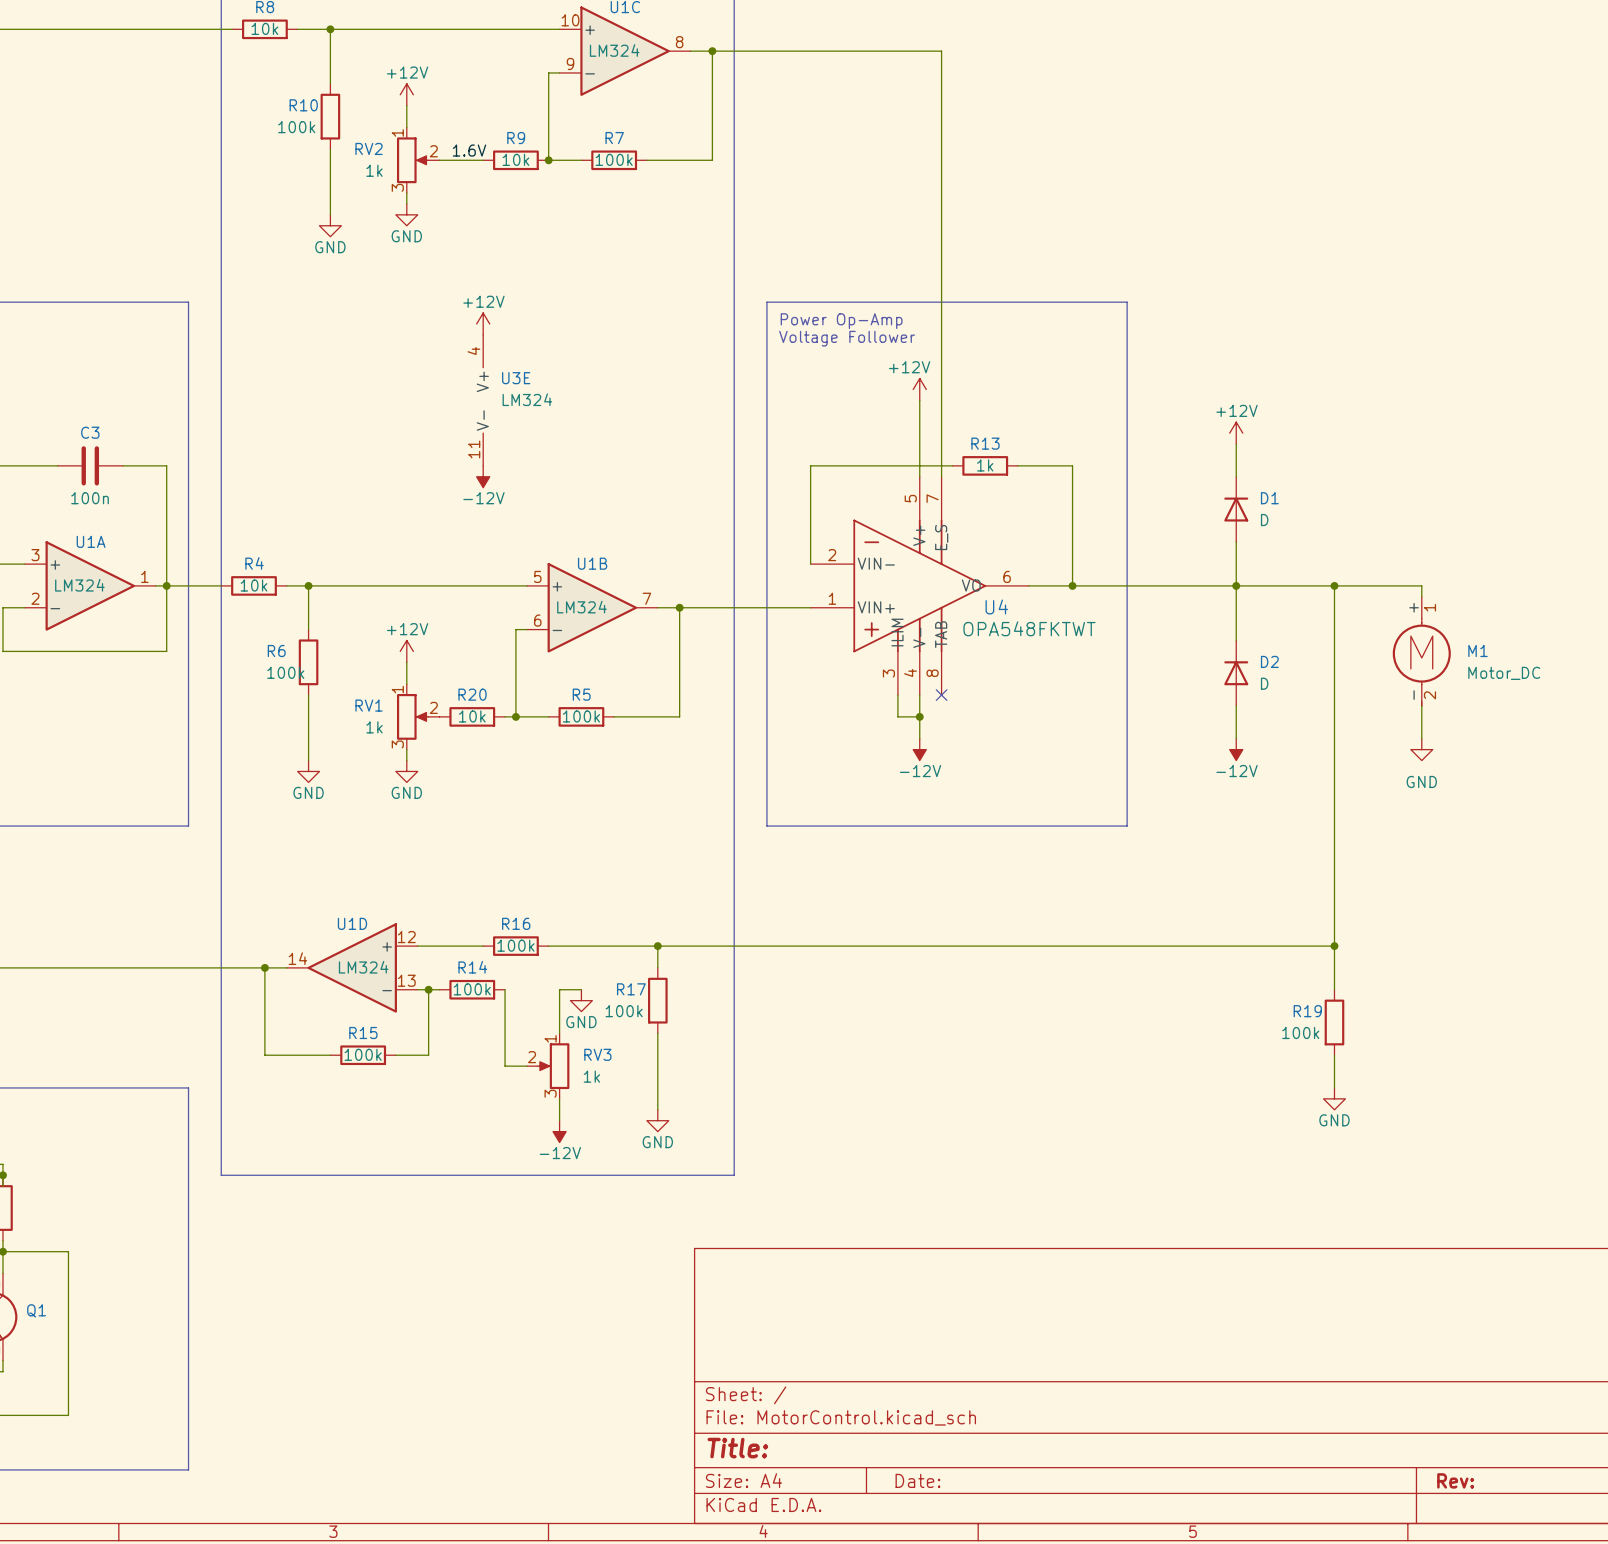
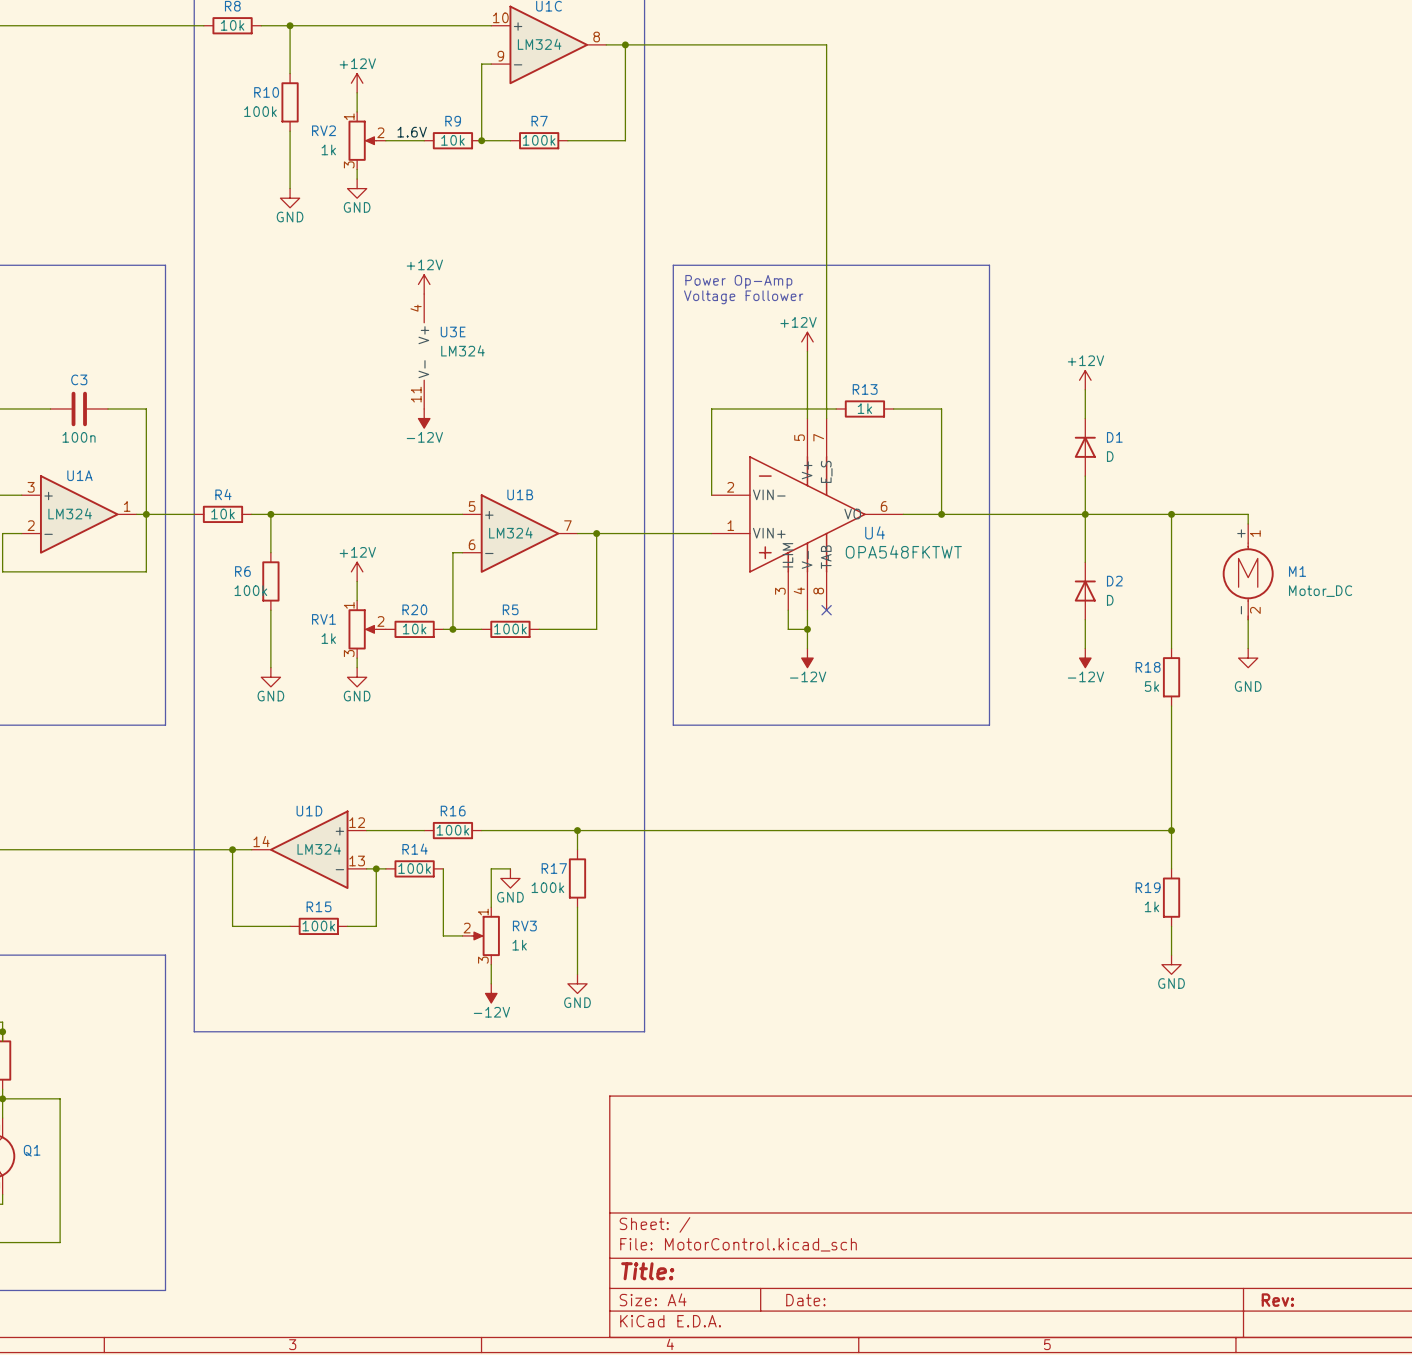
wire: (1334, 738) (1334, 804) -> none
R18: none -> 5k (1171, 677)
R19 value: 100k (1300, 1032) -> 1k (1151, 906)

